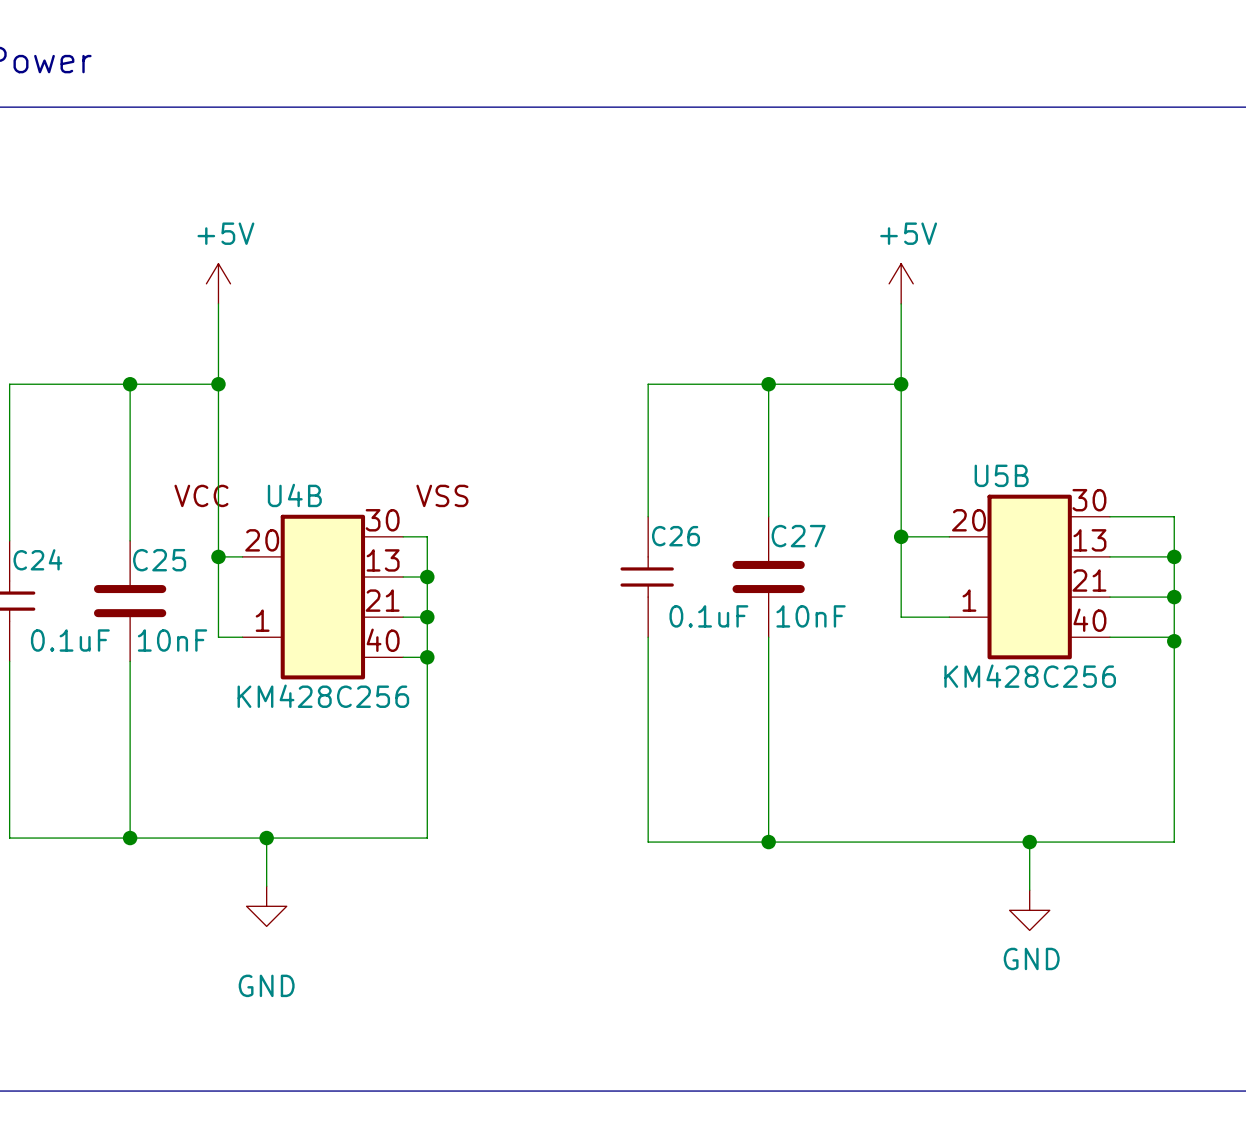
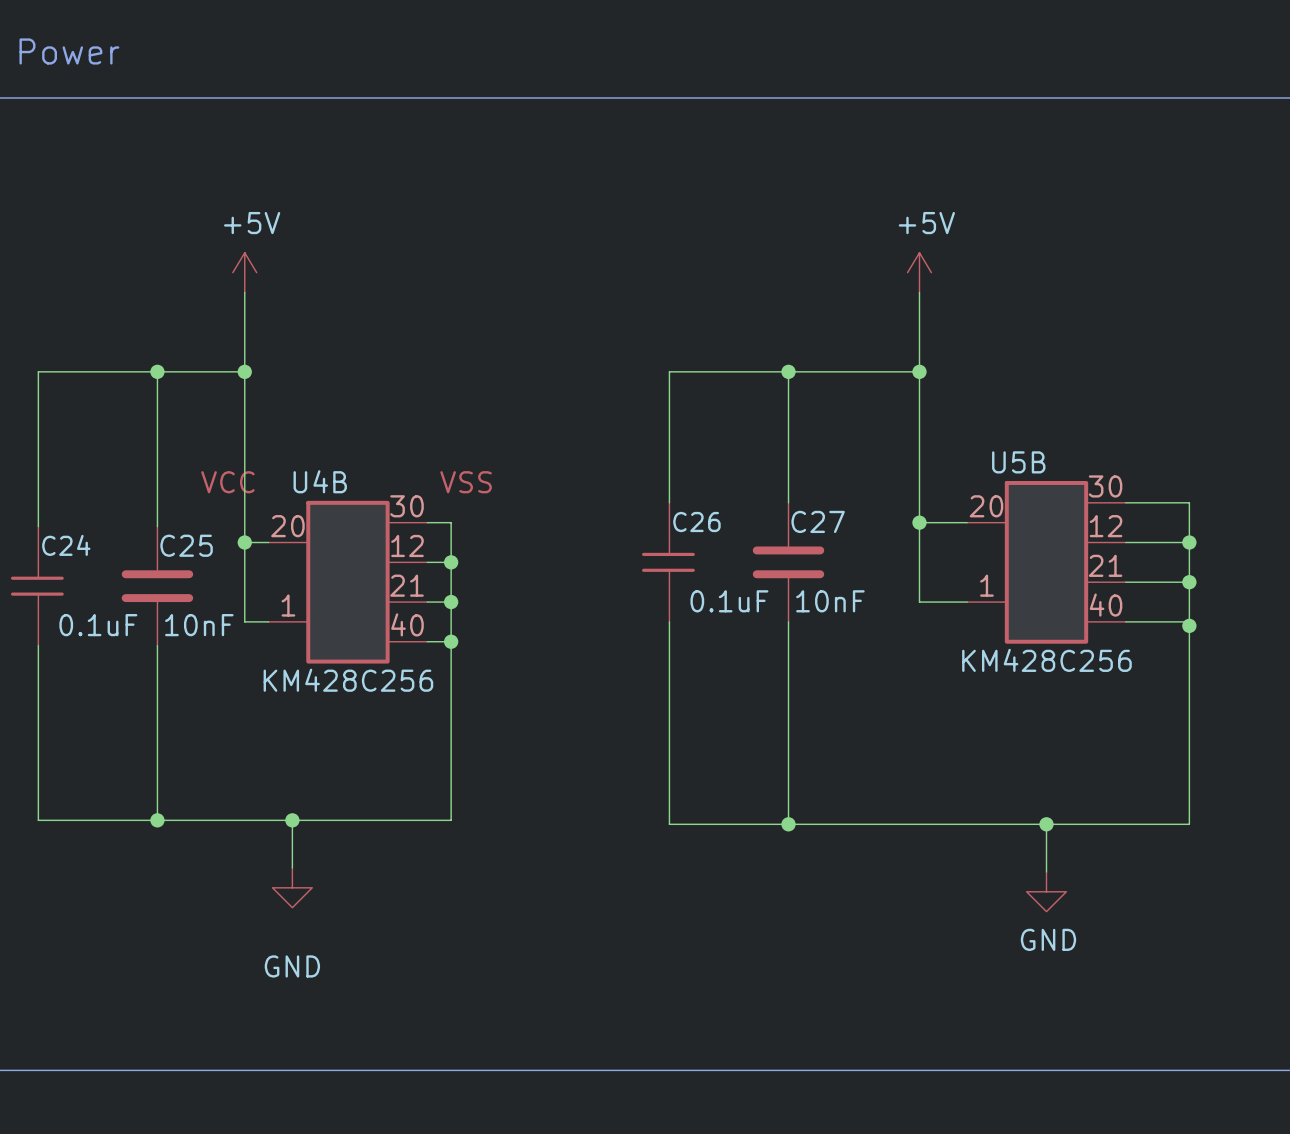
U5B pin number: 13 (1089, 540) -> 12 (1106, 526)
U4B pin number: 13 (383, 560) -> 12 (407, 545)

